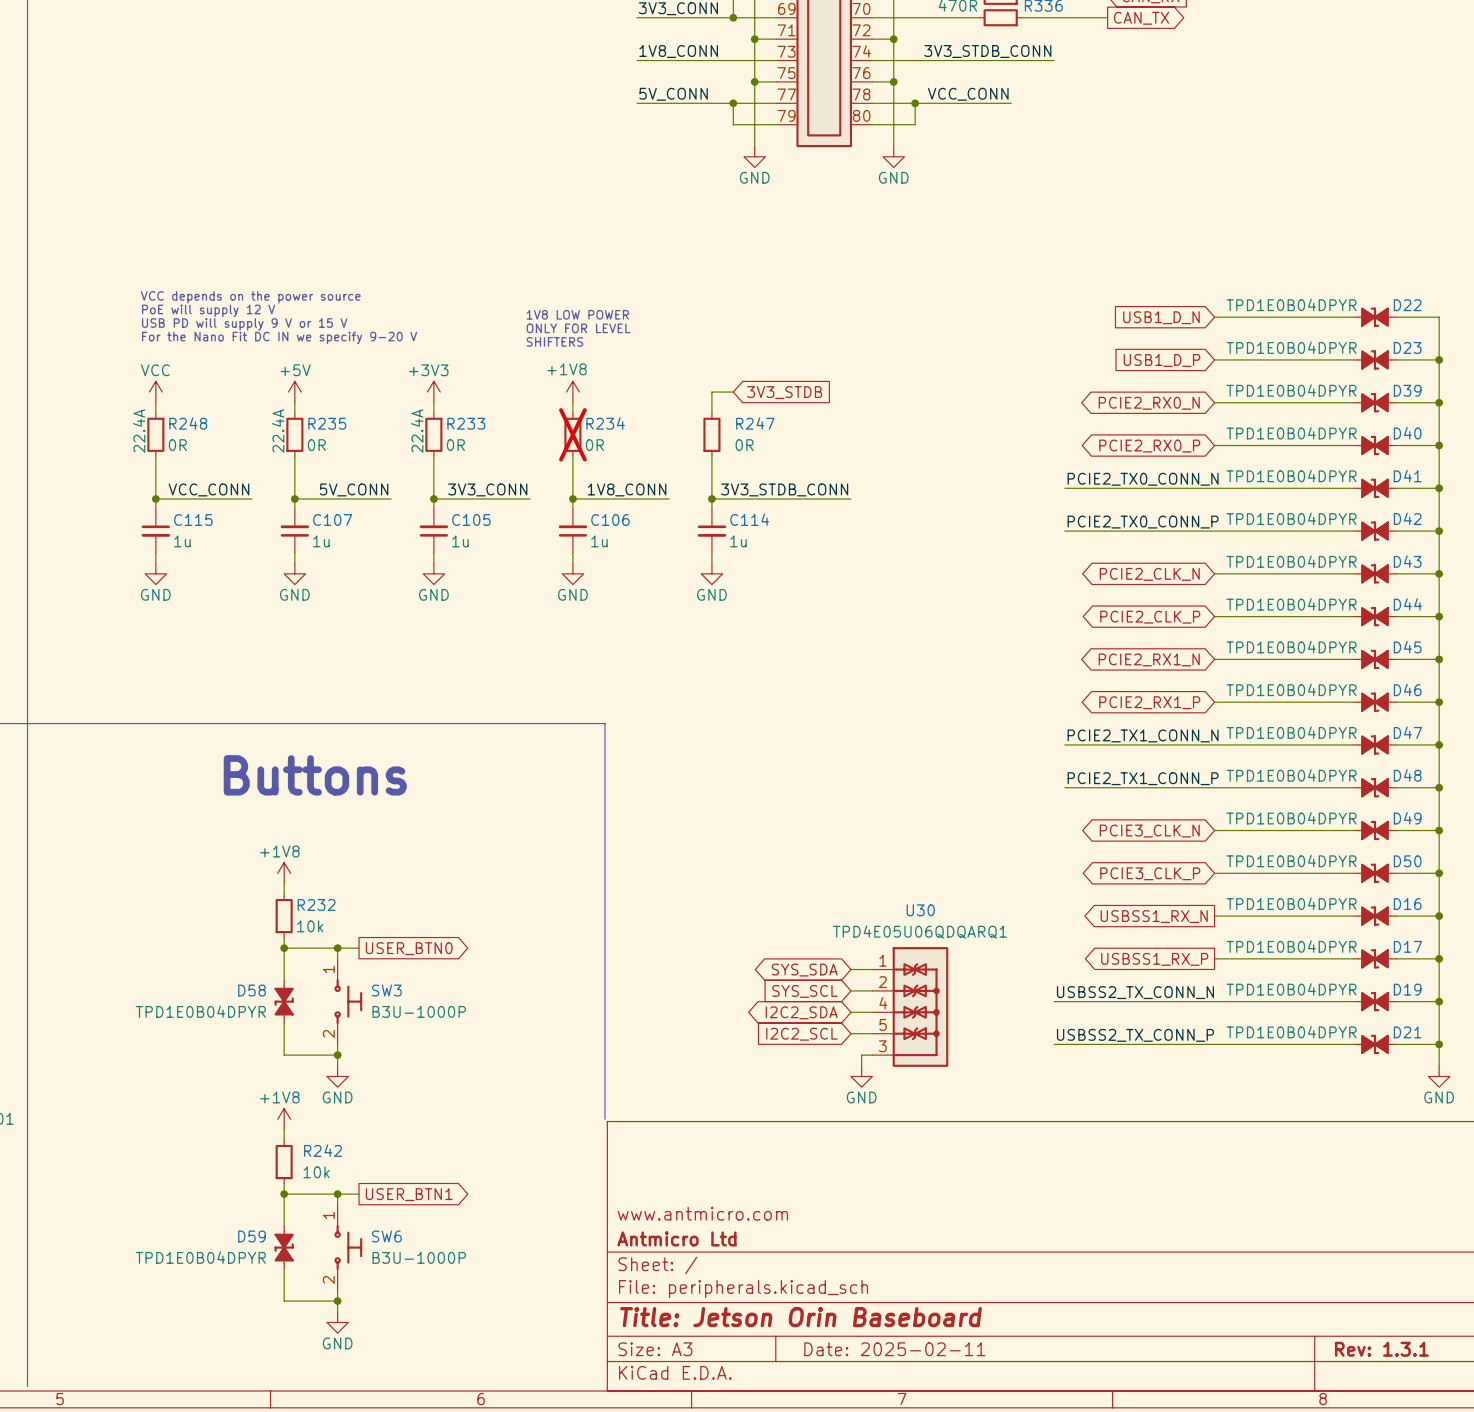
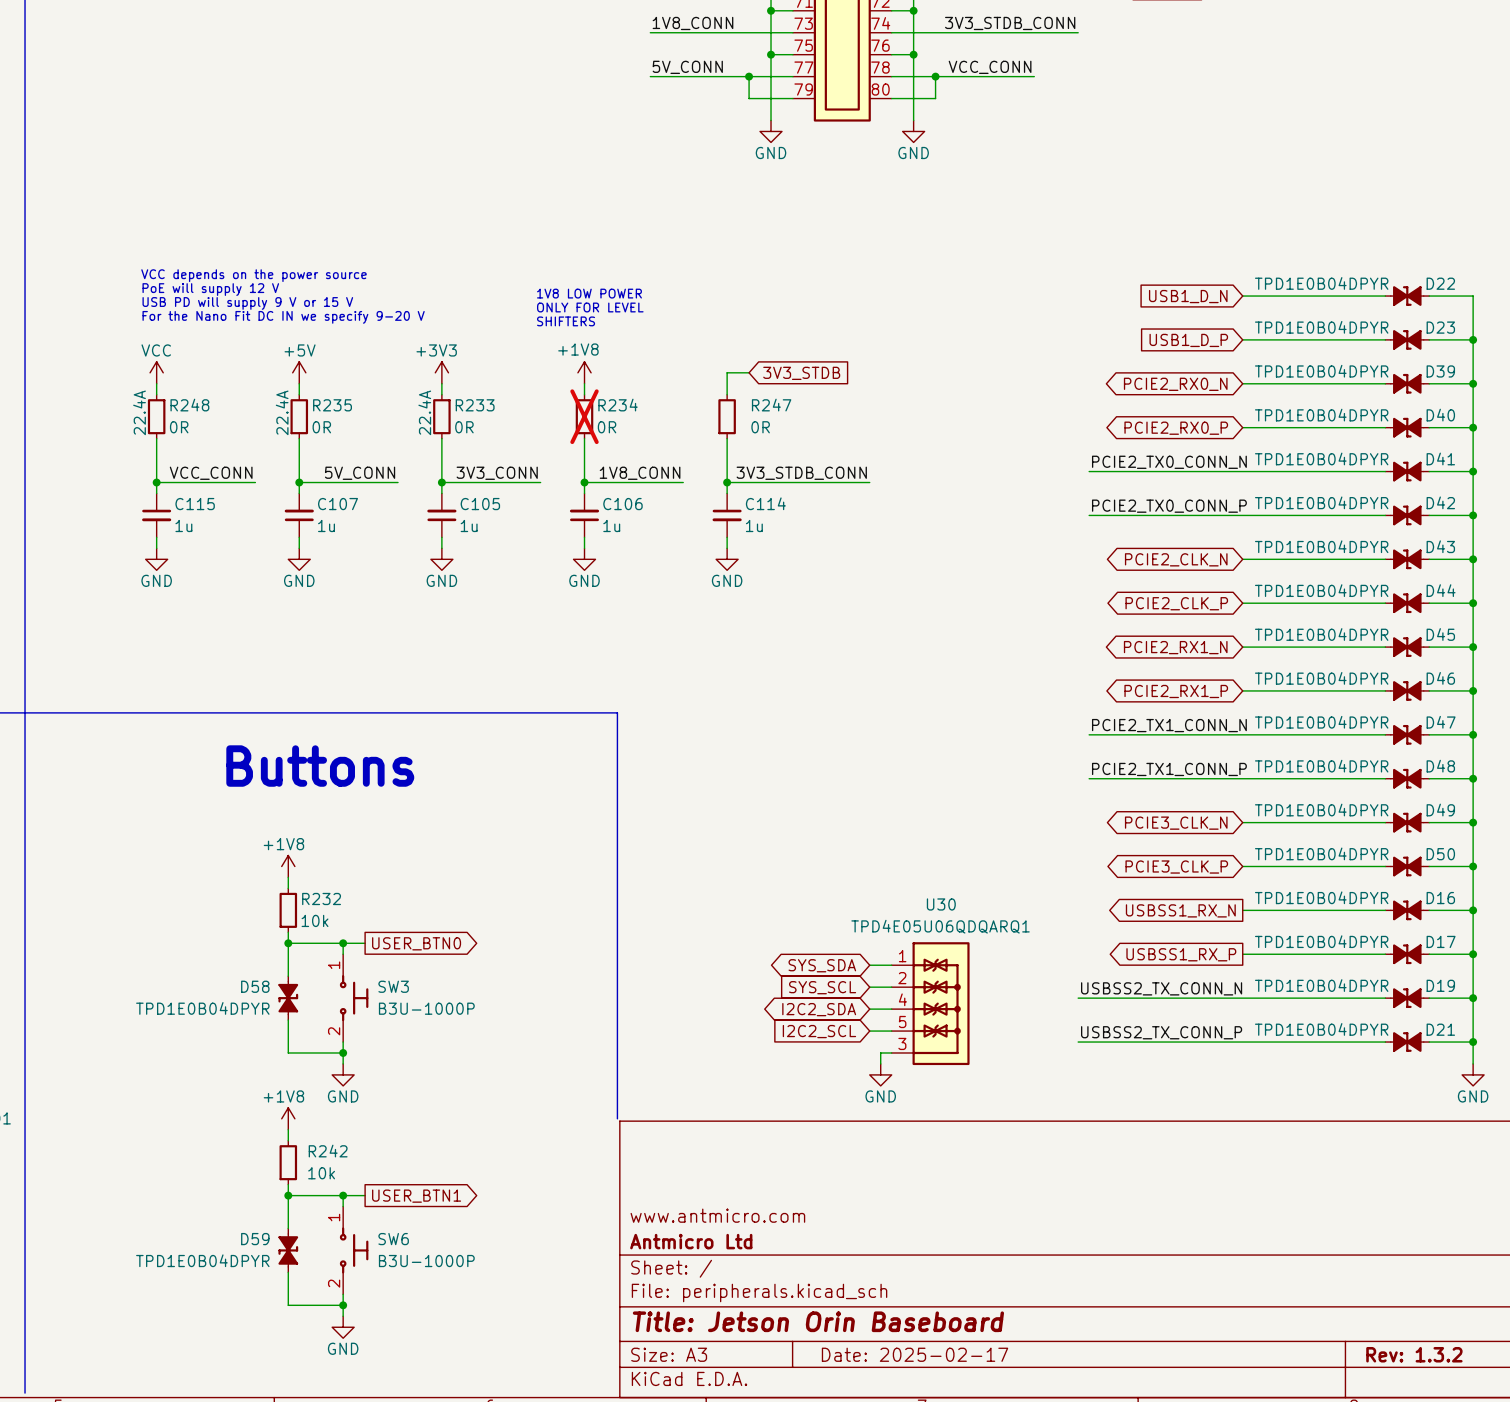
title block: Date: 2025-02-11 (894, 1349) -> Date: 2025-02-17 (915, 1354)
title block: Rev: 1.3.1 (1381, 1349) -> Rev: 1.3.2 (1414, 1354)

